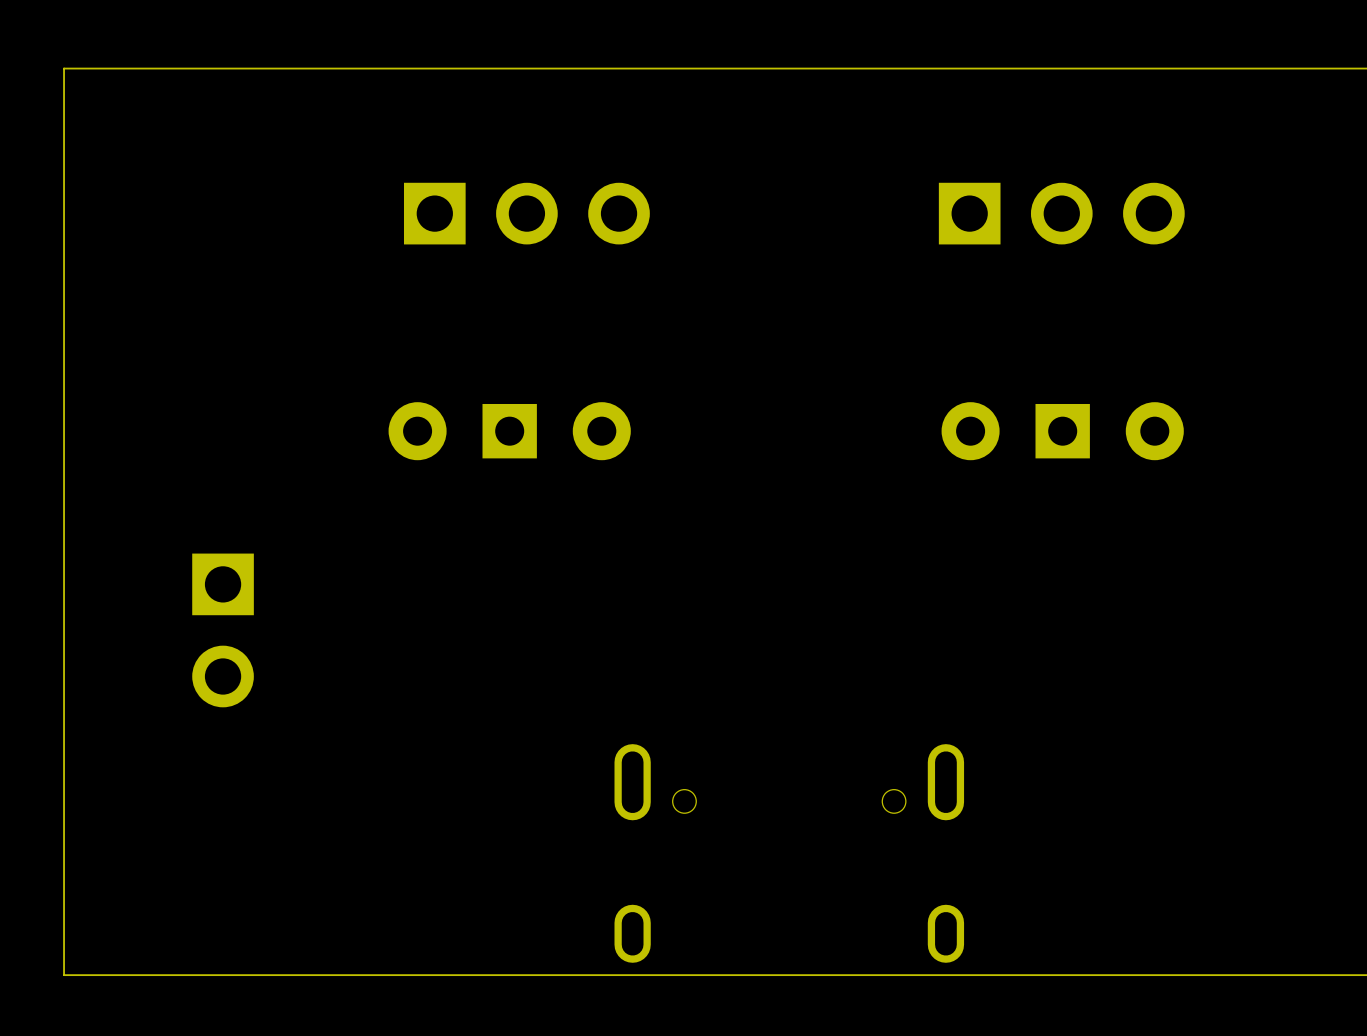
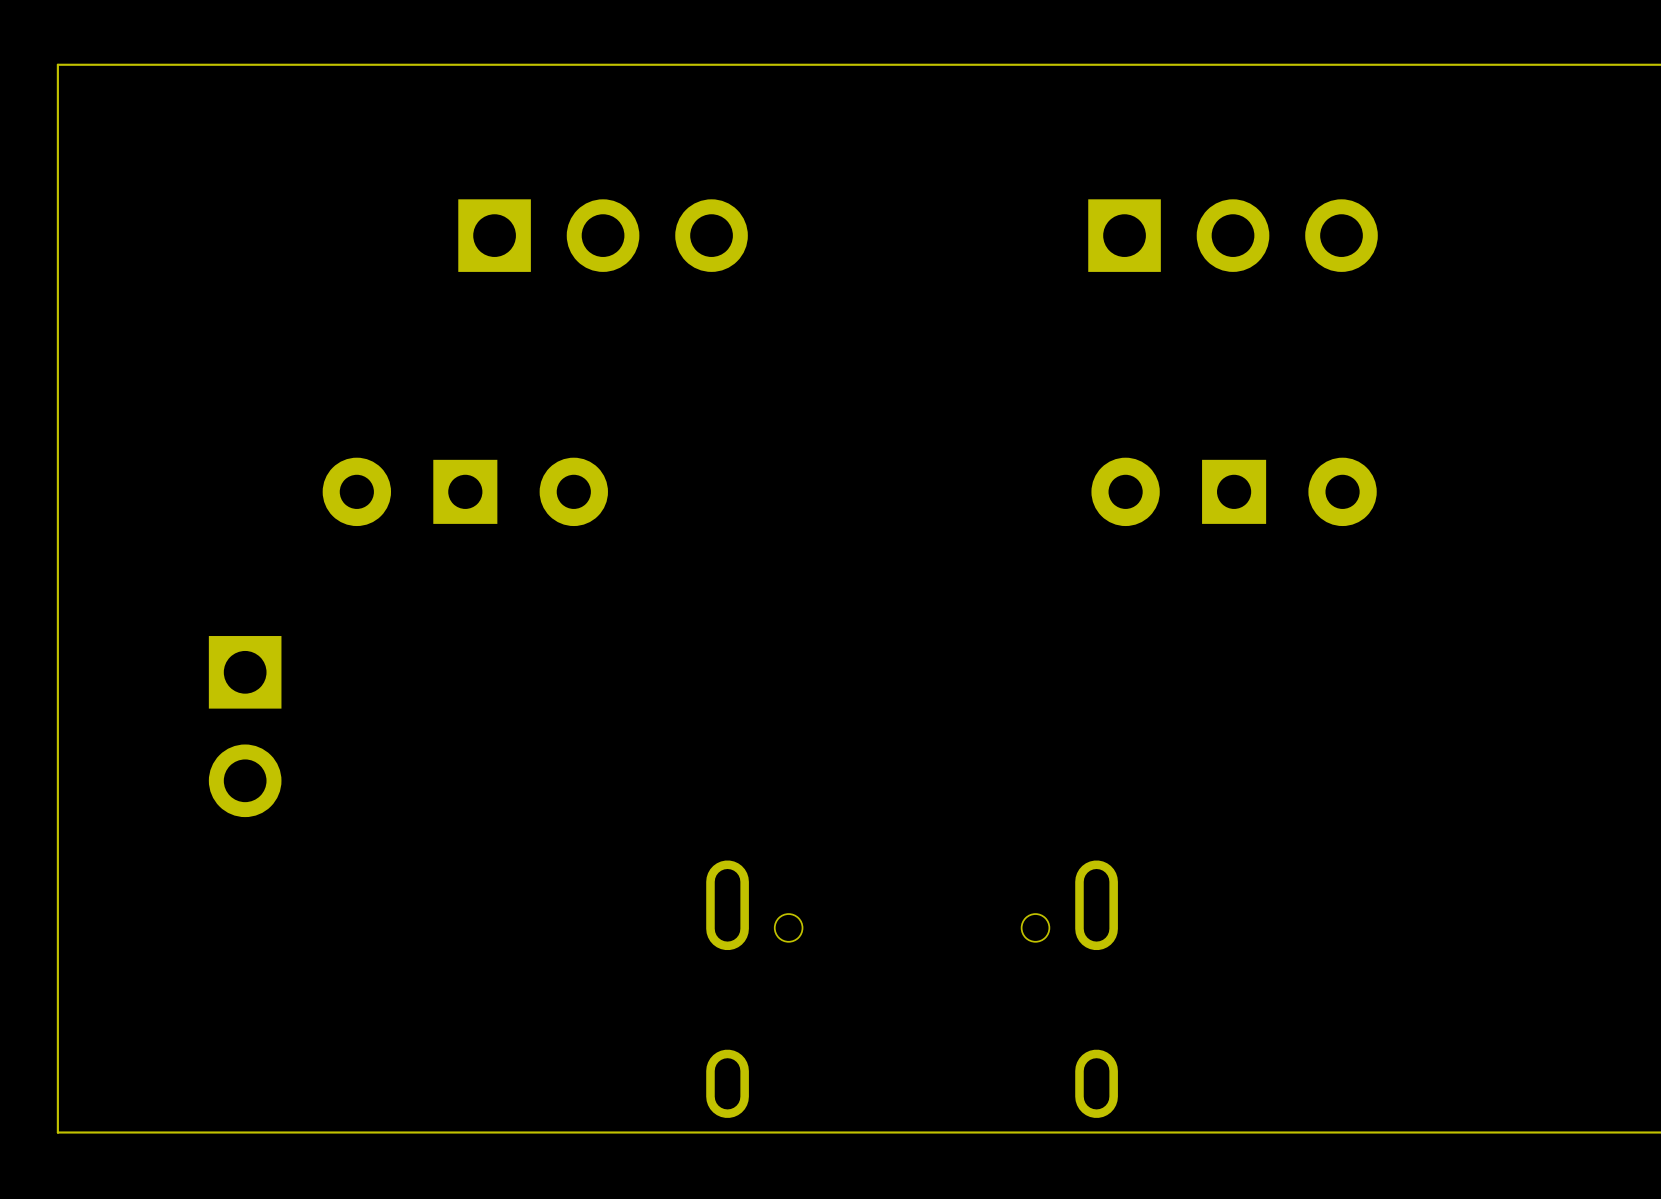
part position: (509, 431) -> (465, 491)

